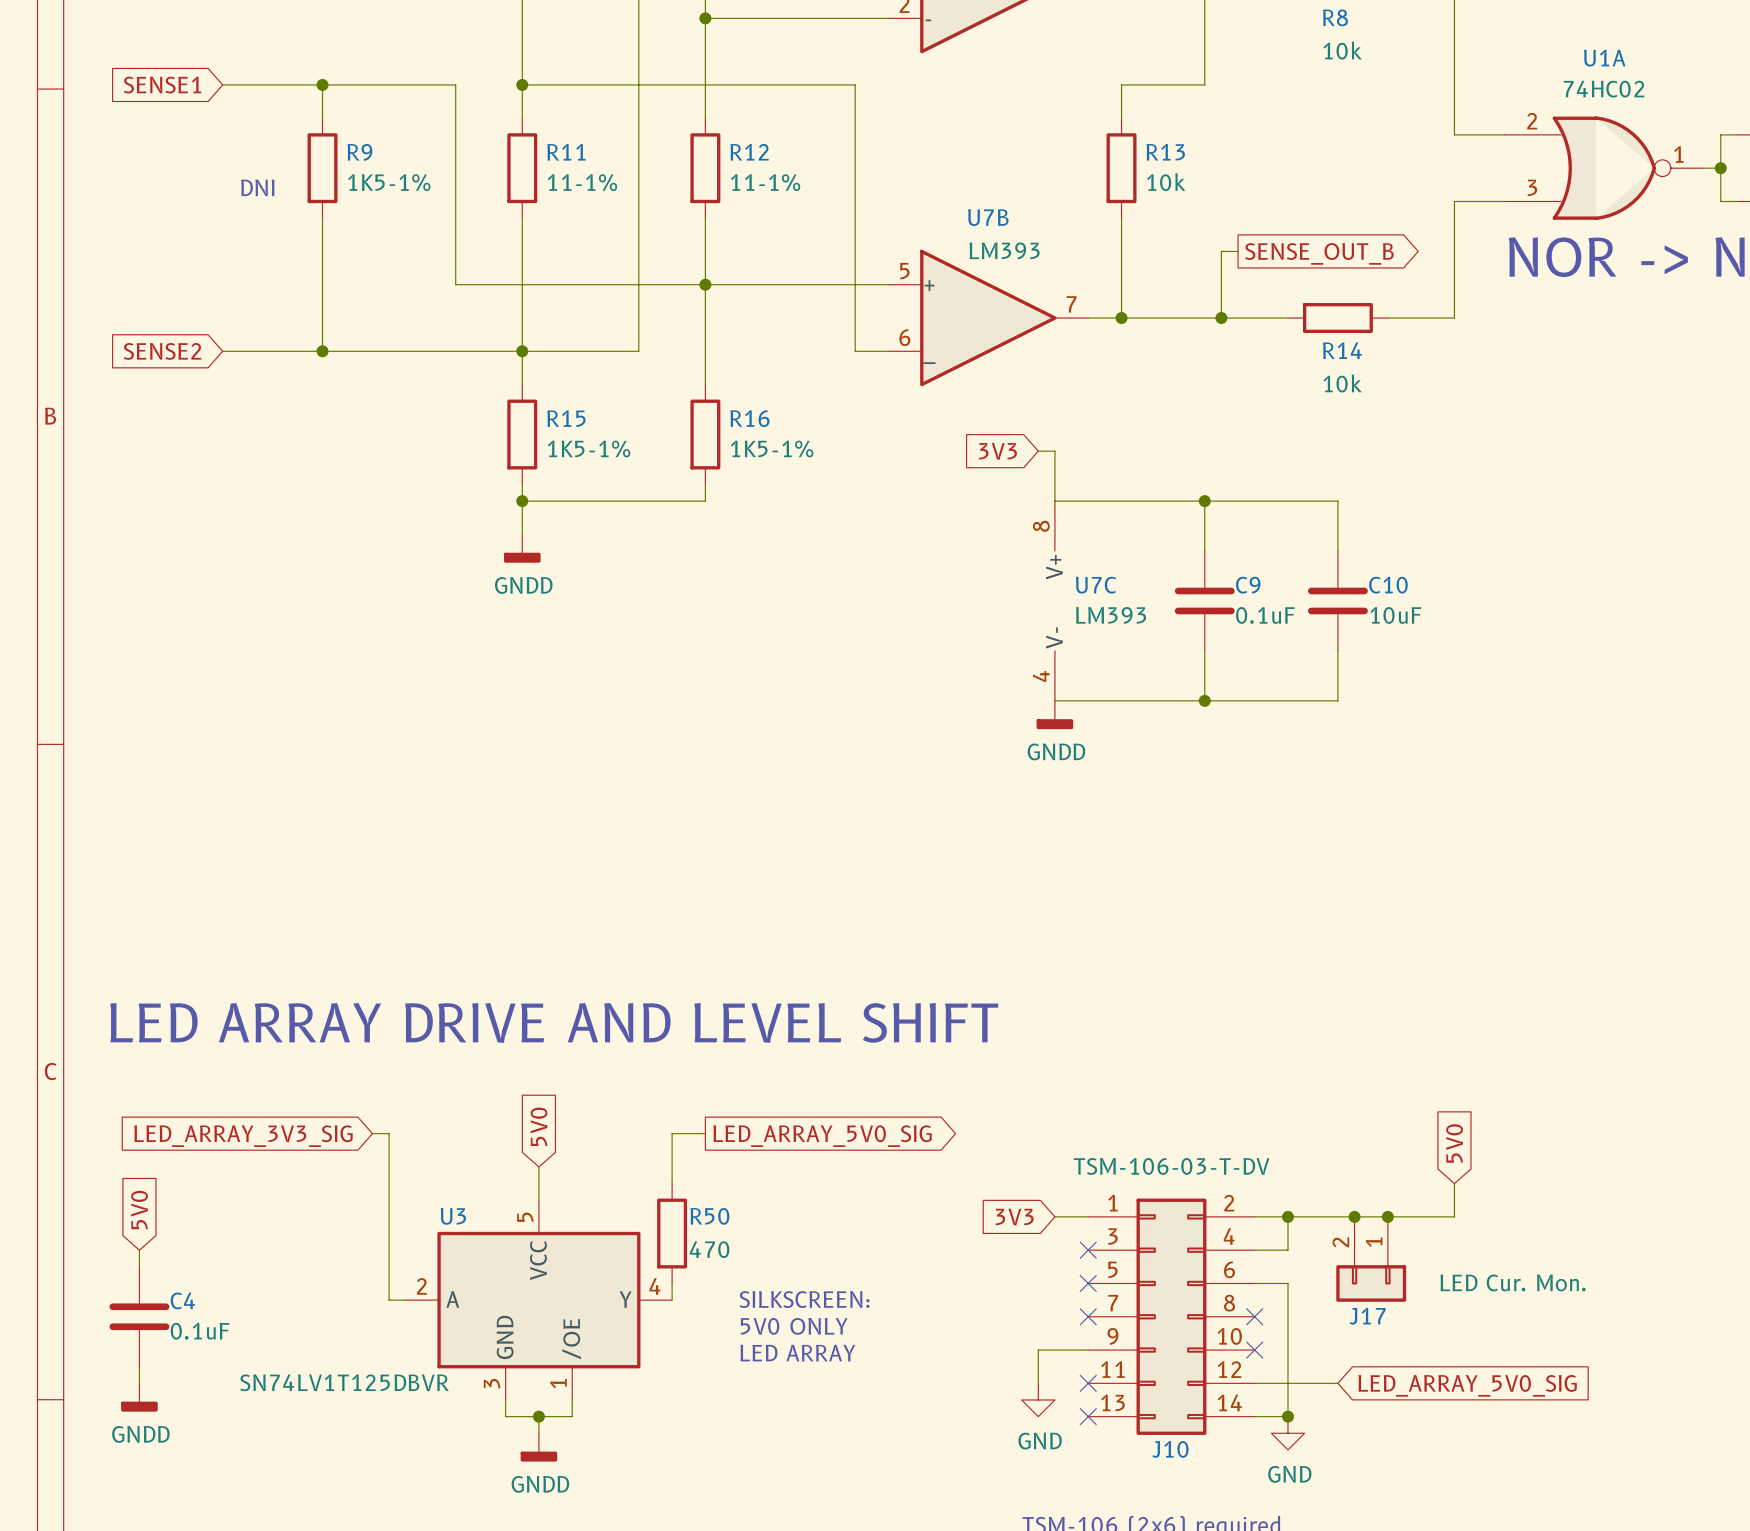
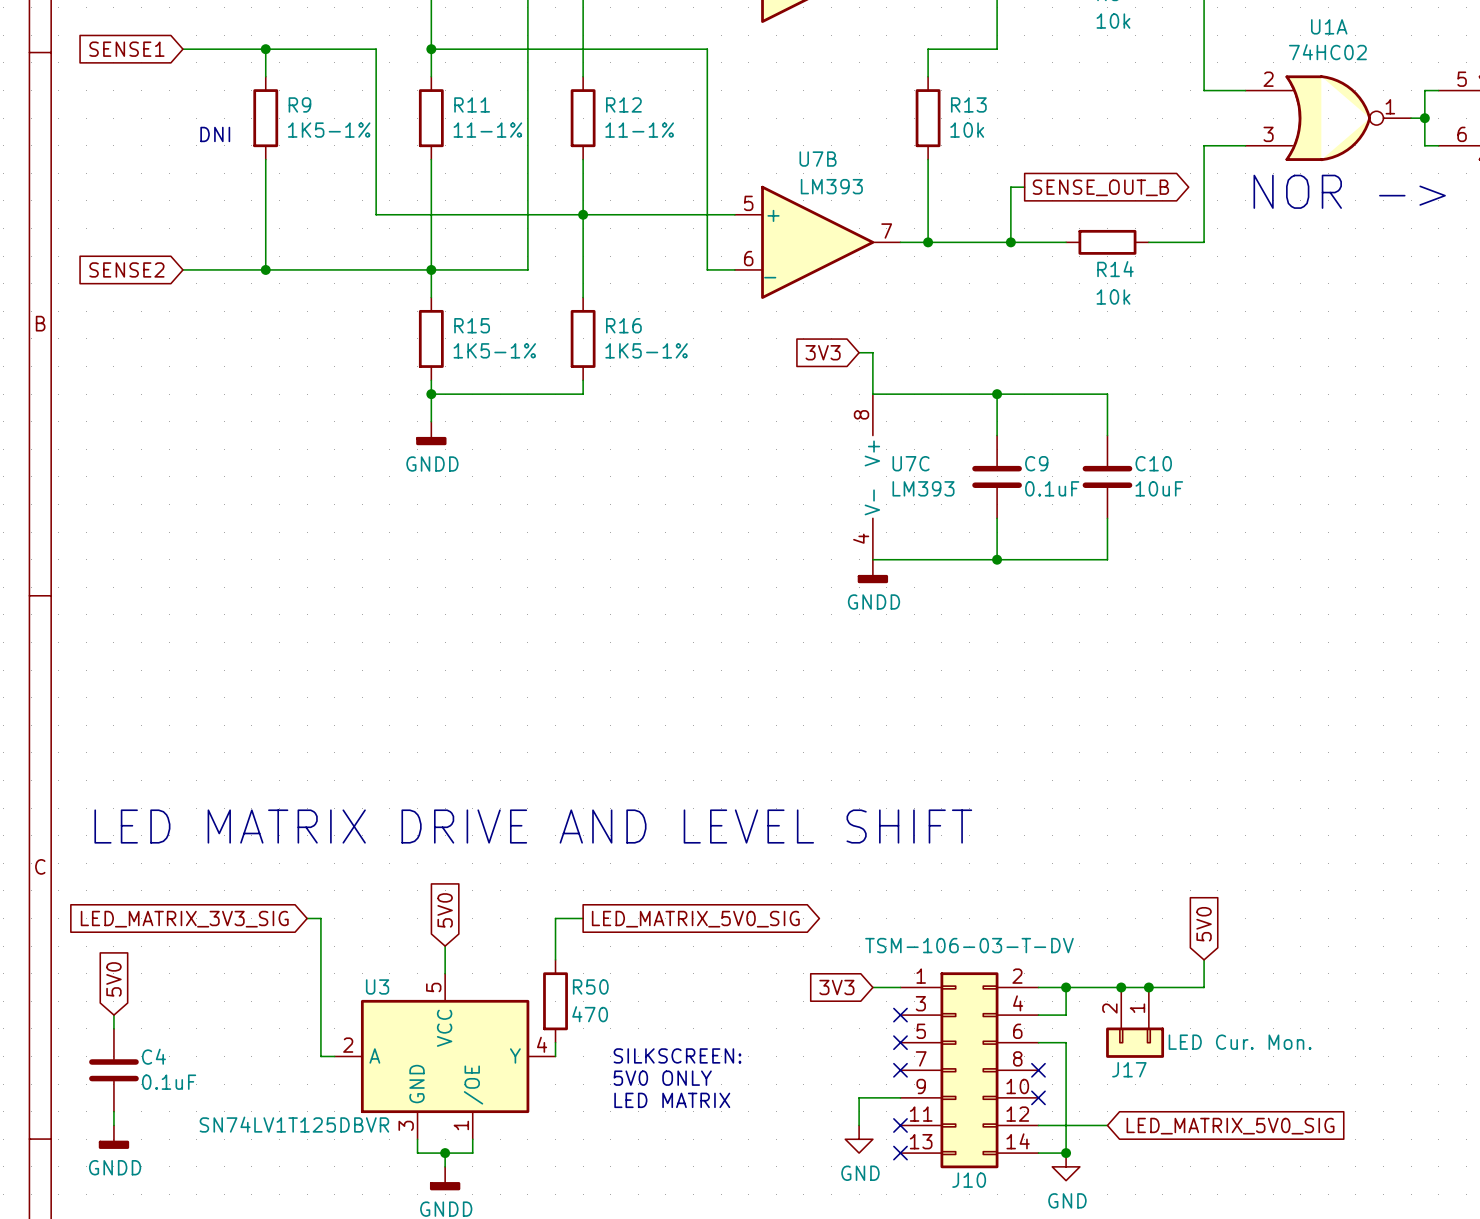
text: LED ARRAY DRIVE AND LEVEL SHIFT (554, 1022) -> LED MATRIX DRIVE AND LEVEL SHIFT (533, 826)
global label: LED_ARRAY_3V3_SIG (243, 1136) -> LED_MATRIX_3V3_SIG (184, 919)
global label: LED_ARRAY_5V0_SIG (822, 1136) -> LED_MATRIX_5V0_SIG (695, 919)
text: LED ARRAY (797, 1353) -> LED MATRIX (672, 1100)
global label: LED_ARRAY_5V0_SIG (1467, 1385) -> LED_MATRIX_5V0_SIG (1230, 1126)

